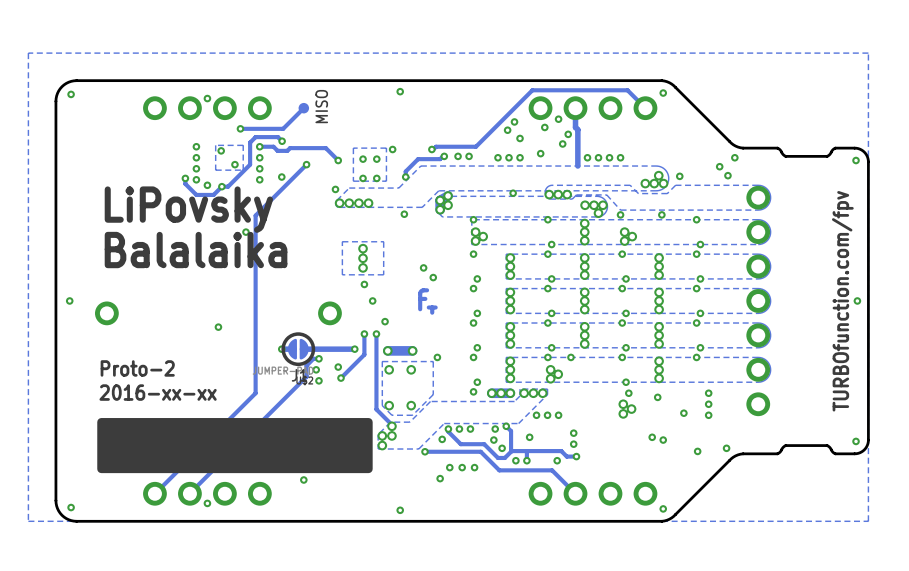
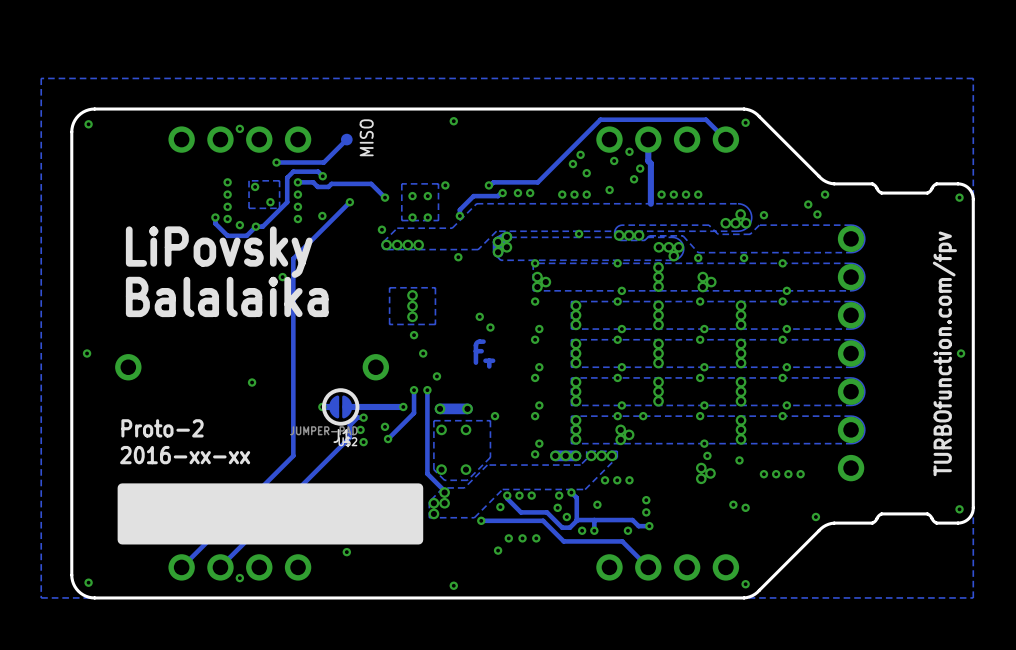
via: (708, 393) -> none
via: (708, 404) -> none
via: none -> (763, 474)
via: none -> (776, 474)
via: none -> (788, 474)
via: none -> (800, 474)
via: (683, 413) -> none
via: (708, 415) -> none
via: (697, 451) -> none

